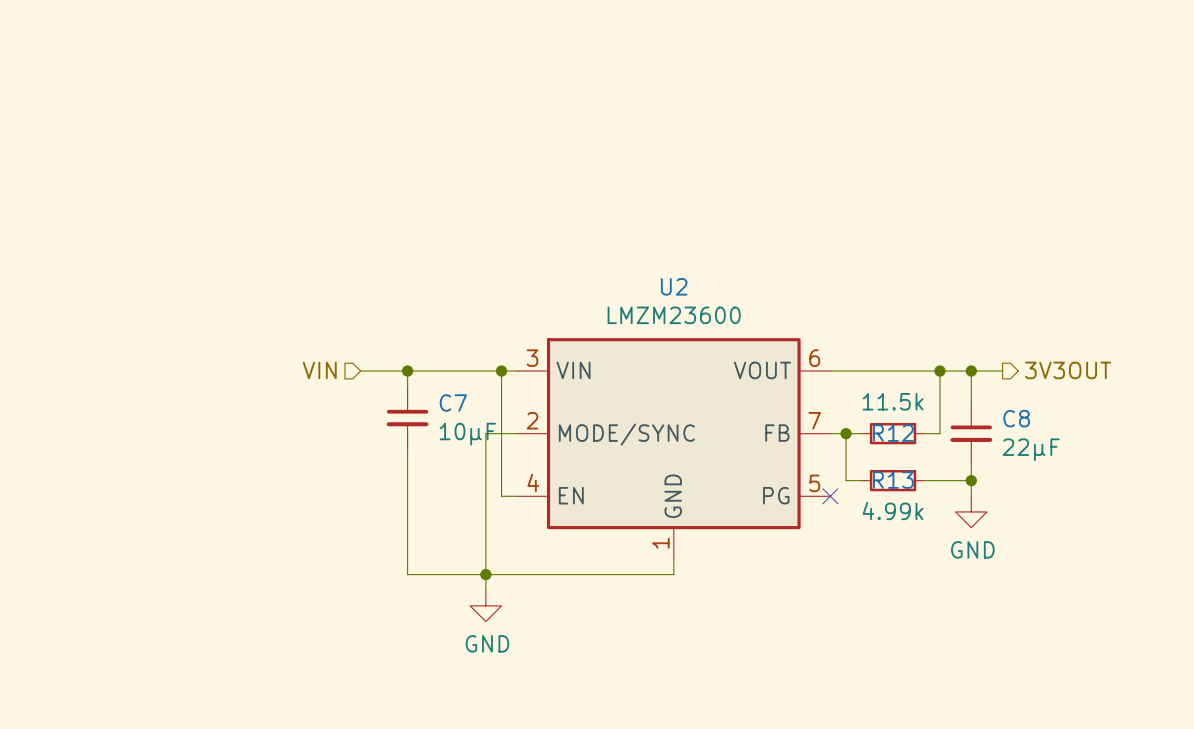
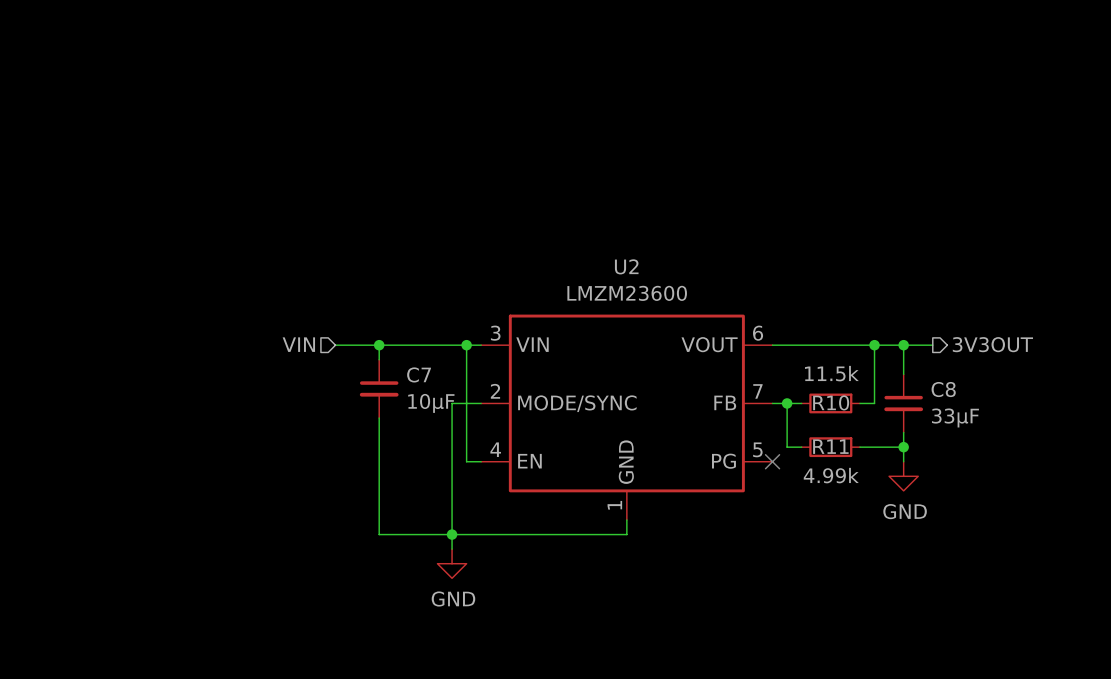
R12 name: R12 (893, 433) -> R10 (831, 402)
C8 value: 22µF (1031, 449) -> 33µF (955, 417)
R13 name: R13 (893, 480) -> R11 (830, 446)

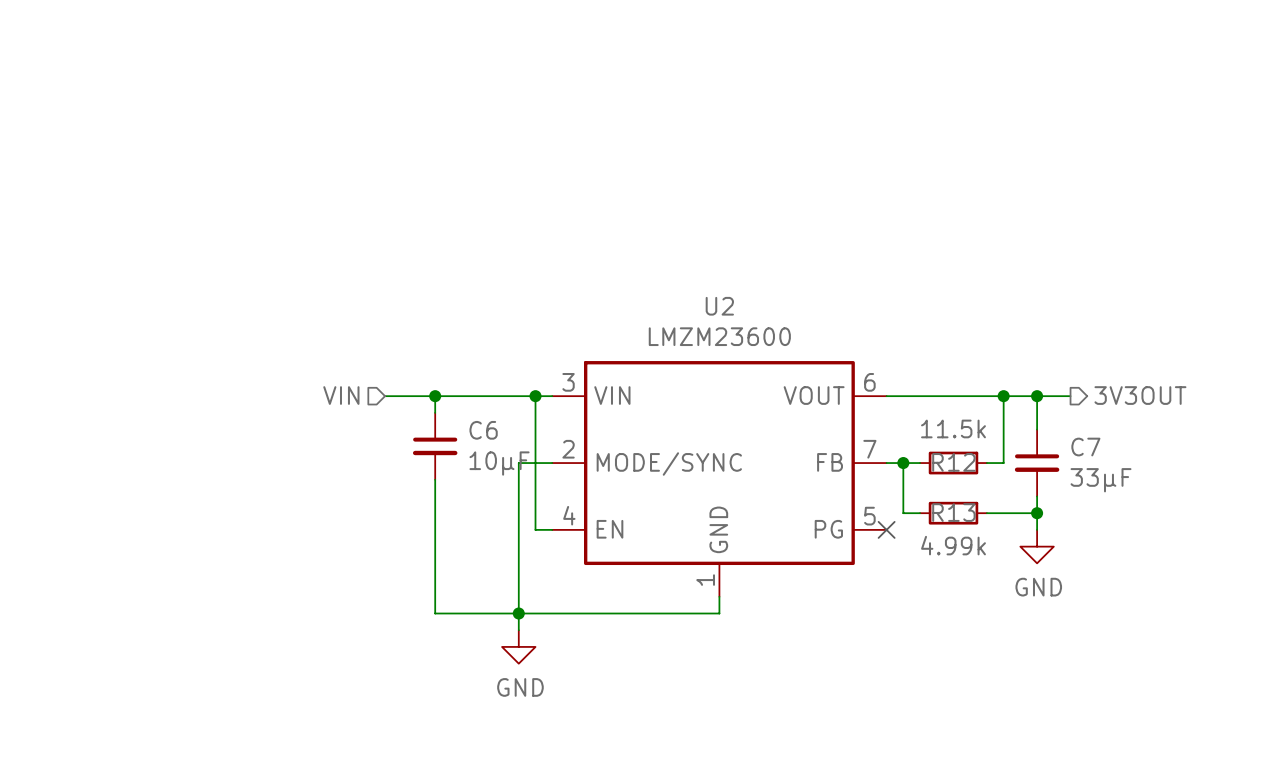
C7 name: C7 (419, 374) -> C6 (483, 430)
C8 name: C8 (943, 389) -> C7 (1085, 447)
R10 name: R10 (831, 402) -> R12 (953, 462)
R11 name: R11 (830, 446) -> R13 (953, 512)

